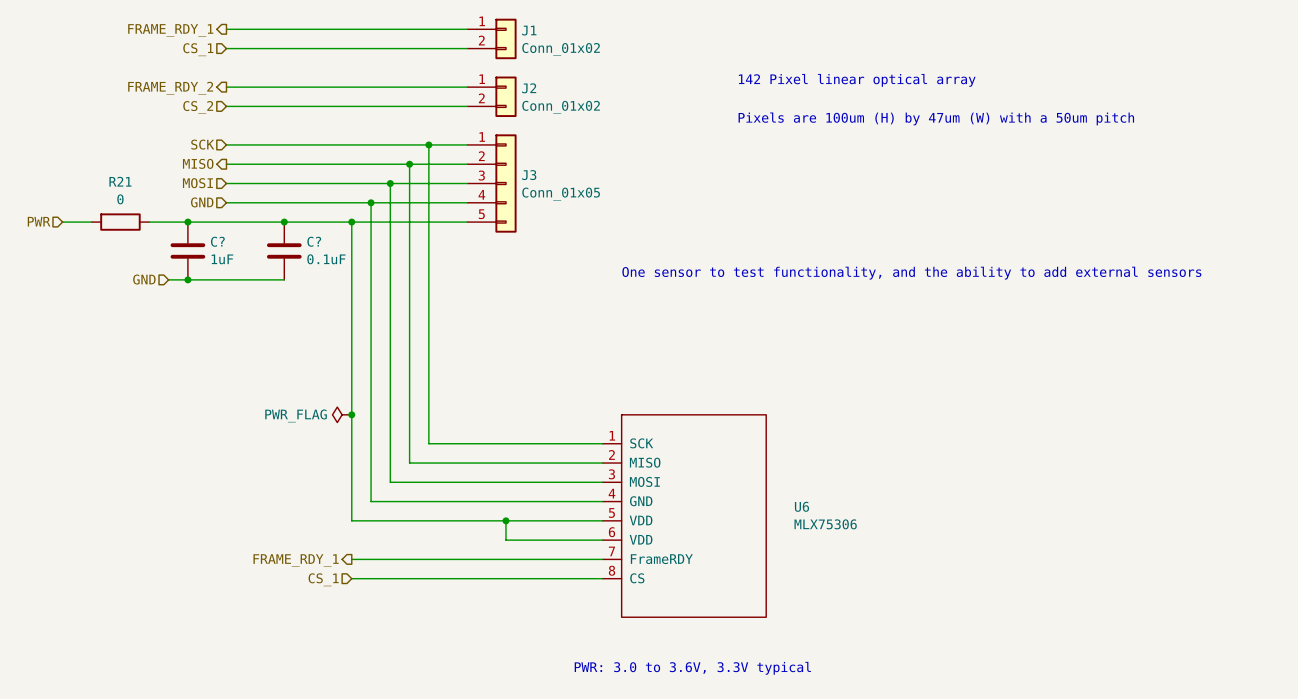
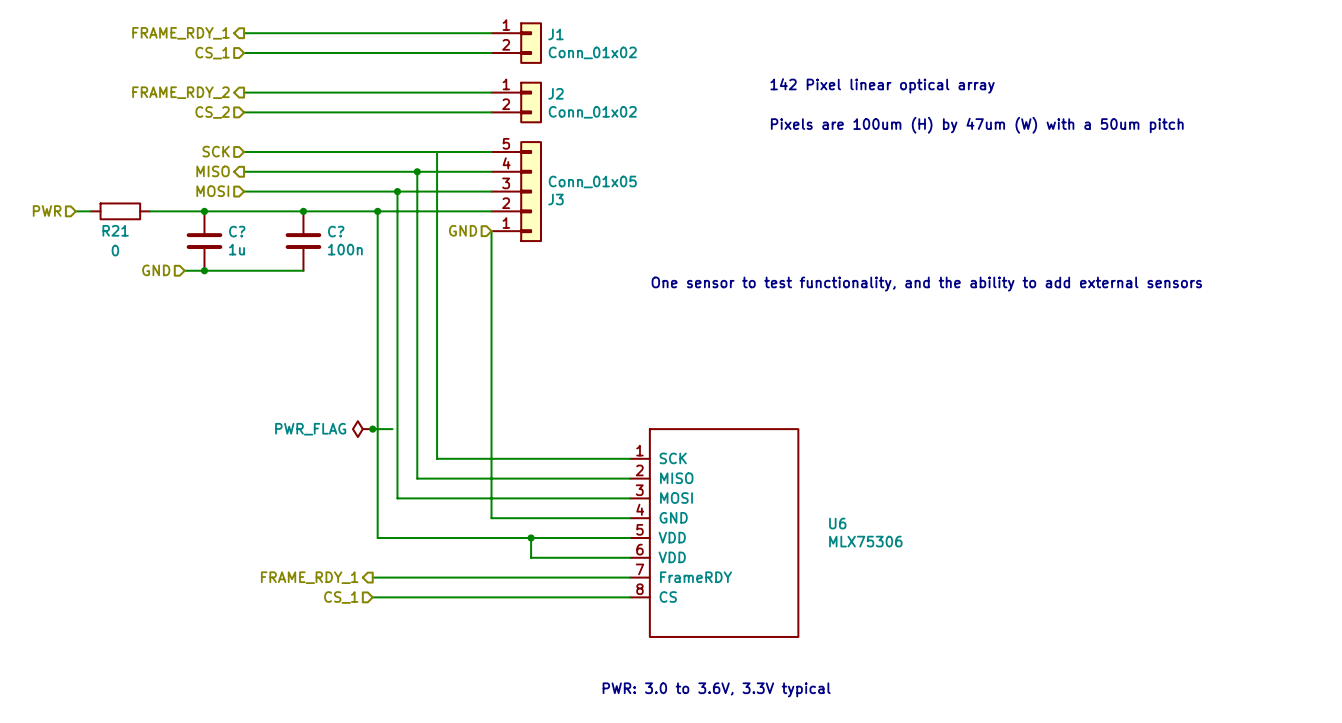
wire: (428, 144) (428, 443) -> (437, 151) (437, 458) (451, 458)
junction: (428, 144) -> none
junction: none -> (417, 171)
wire: (409, 164) (409, 463) -> (417, 171) (417, 478) (432, 478)
junction: (409, 164) -> none
R21 name position: R21 (120, 181) -> R21 (115, 230)
junction: none -> (397, 191)
wire: (390, 183) (390, 482) -> (397, 191) (397, 498) (412, 498)
junction: (390, 183) -> none
J3 flip: as is (505, 183) -> up-down (531, 191)
R21 value position: 0 (120, 199) -> 0 (115, 250)
wire: none -> (75, 211) (90, 211)
wire: none -> (150, 211) (244, 211)
junction: none -> (204, 211)
hierarchical label: GND (202, 202) -> none
junction: none -> (377, 211)
wire: (371, 202) (371, 501) (467, 501) -> (491, 231) (491, 518)
junction: (371, 202) -> none
hierarchical label position: PWR (39, 221) -> PWR (47, 210)
hierarchical label: none -> GND (463, 230)
wire: (62, 222) (91, 222) -> none
R21 position: (120, 222) -> (120, 211)
wire: (149, 222) (467, 222) -> none
junction: (187, 222) -> none
junction position: (284, 222) -> (303, 211)
wire: (351, 222) (351, 520) (356, 520) -> (377, 211) (377, 537)
junction: (351, 222) -> none
C?: none -> 1u (204, 241)
C?: none -> 100n (303, 241)
C?: 1uF (187, 250) -> none
C?: 0.1uF (284, 250) -> none
junction: none -> (204, 270)
hierarchical label position: GND (144, 279) -> GND (156, 270)
wire: (168, 279) (284, 279) -> (184, 270) (303, 270)
junction: (187, 279) -> none
wire: none -> (372, 429) (392, 429)

